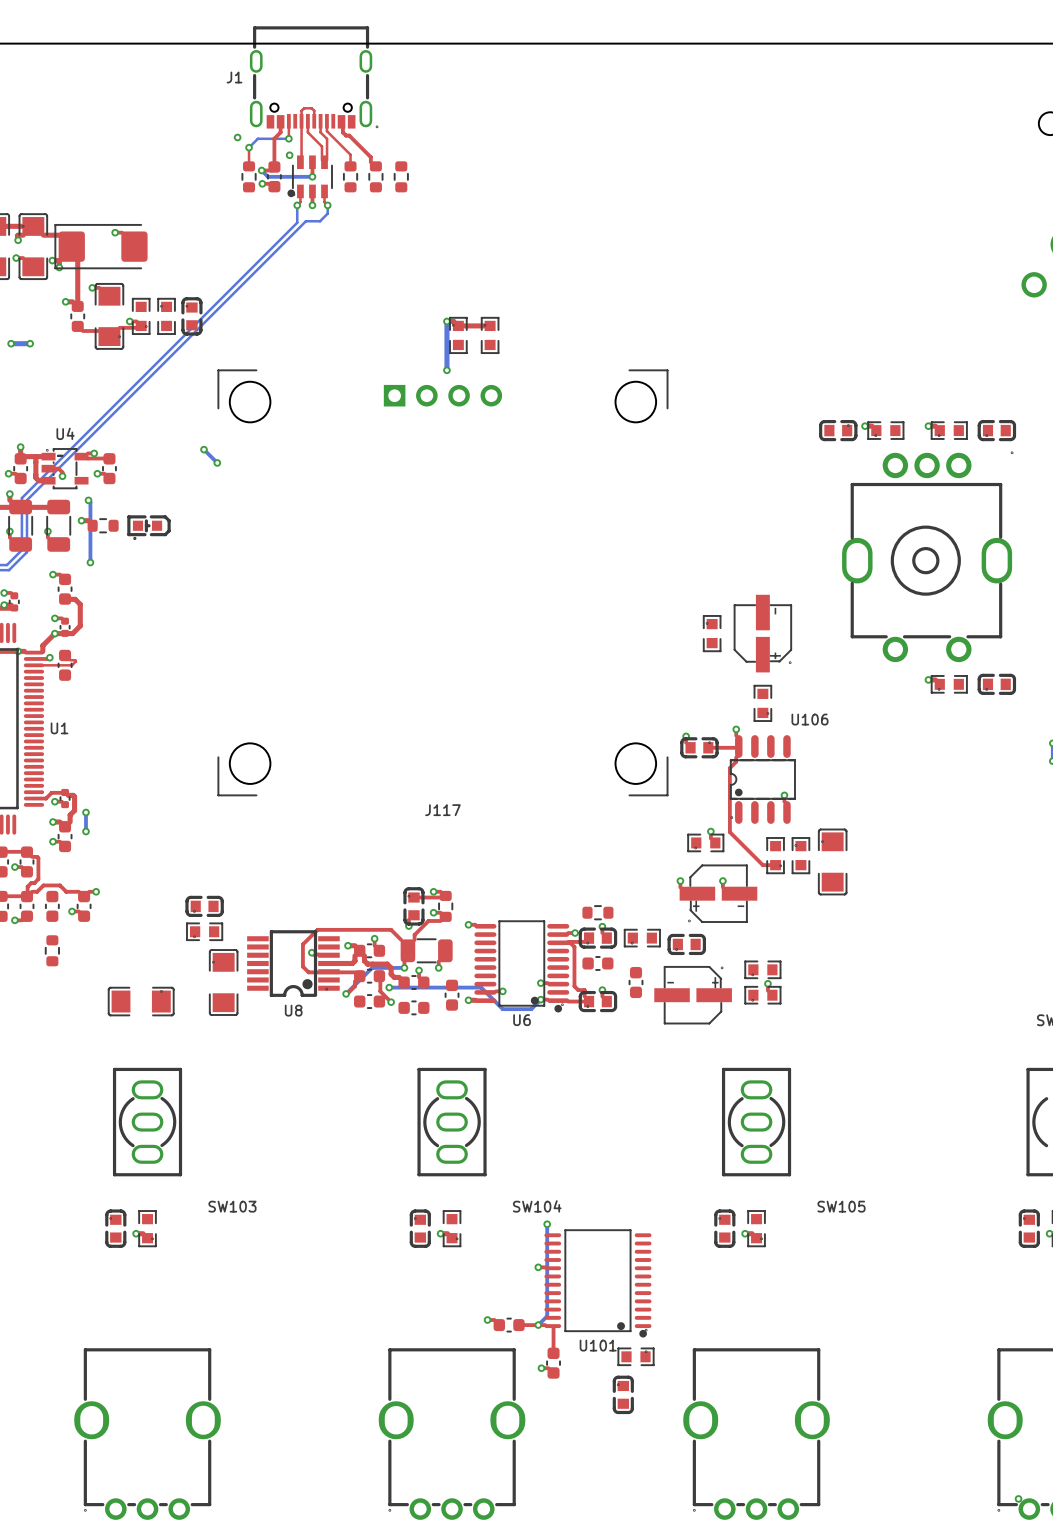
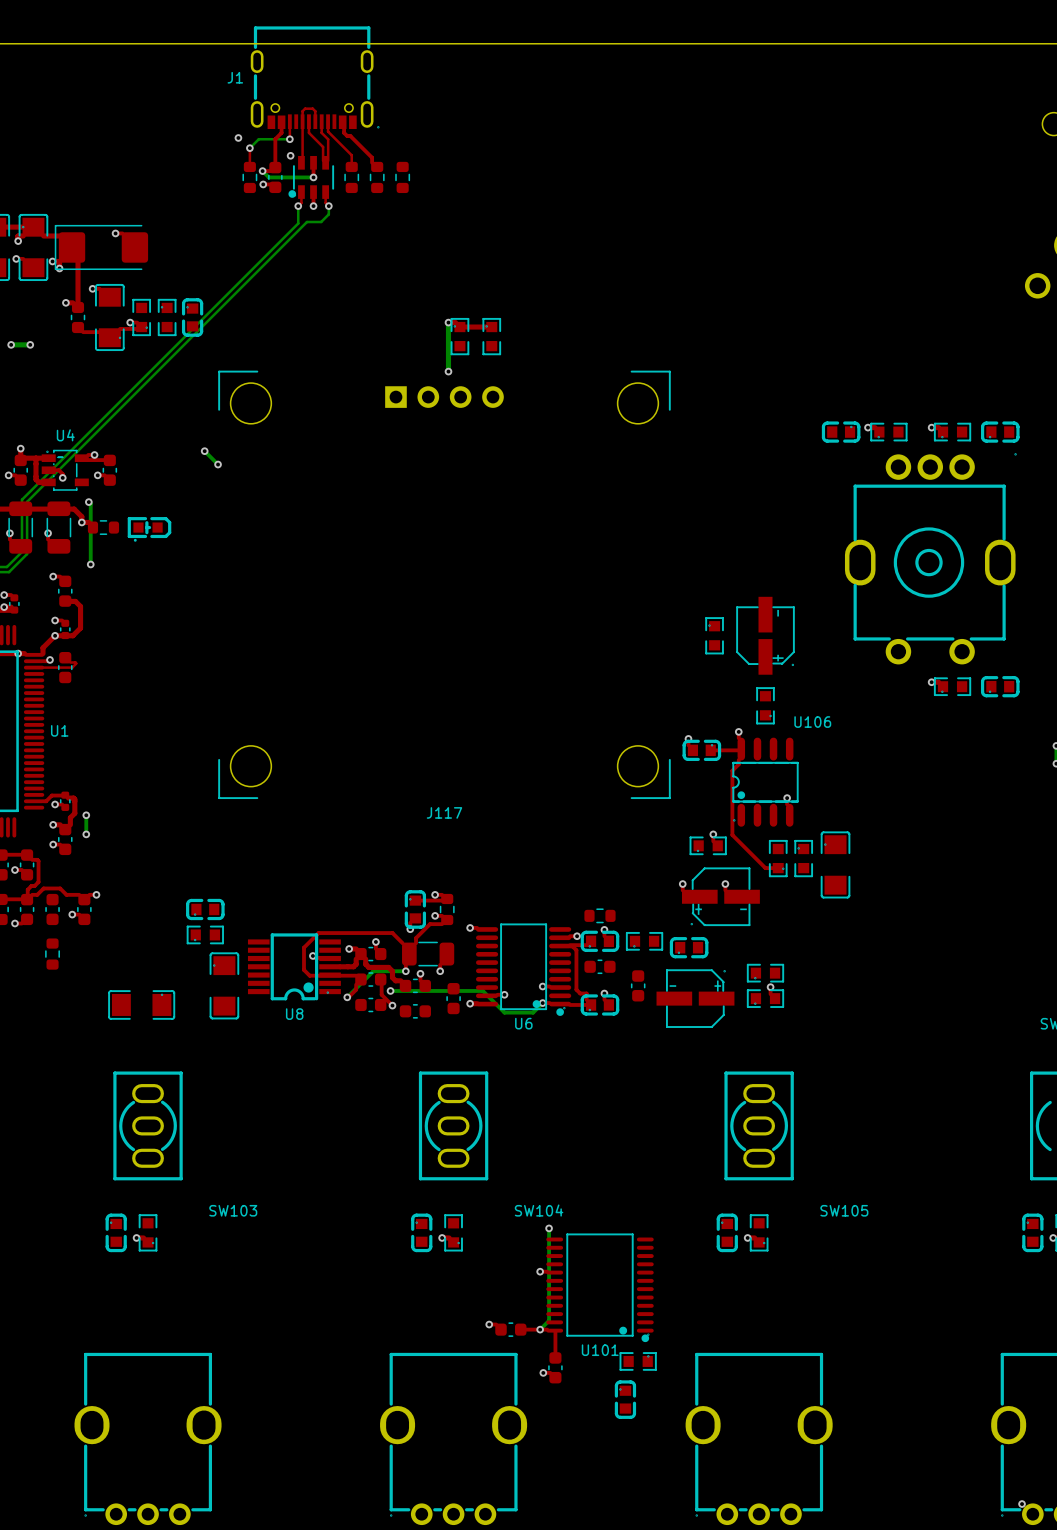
top track: (9, 494) (9, 500) -> none
via: (9, 494) -> none
top track: none -> (66, 509) (74, 509) (81, 516) (81, 522)

